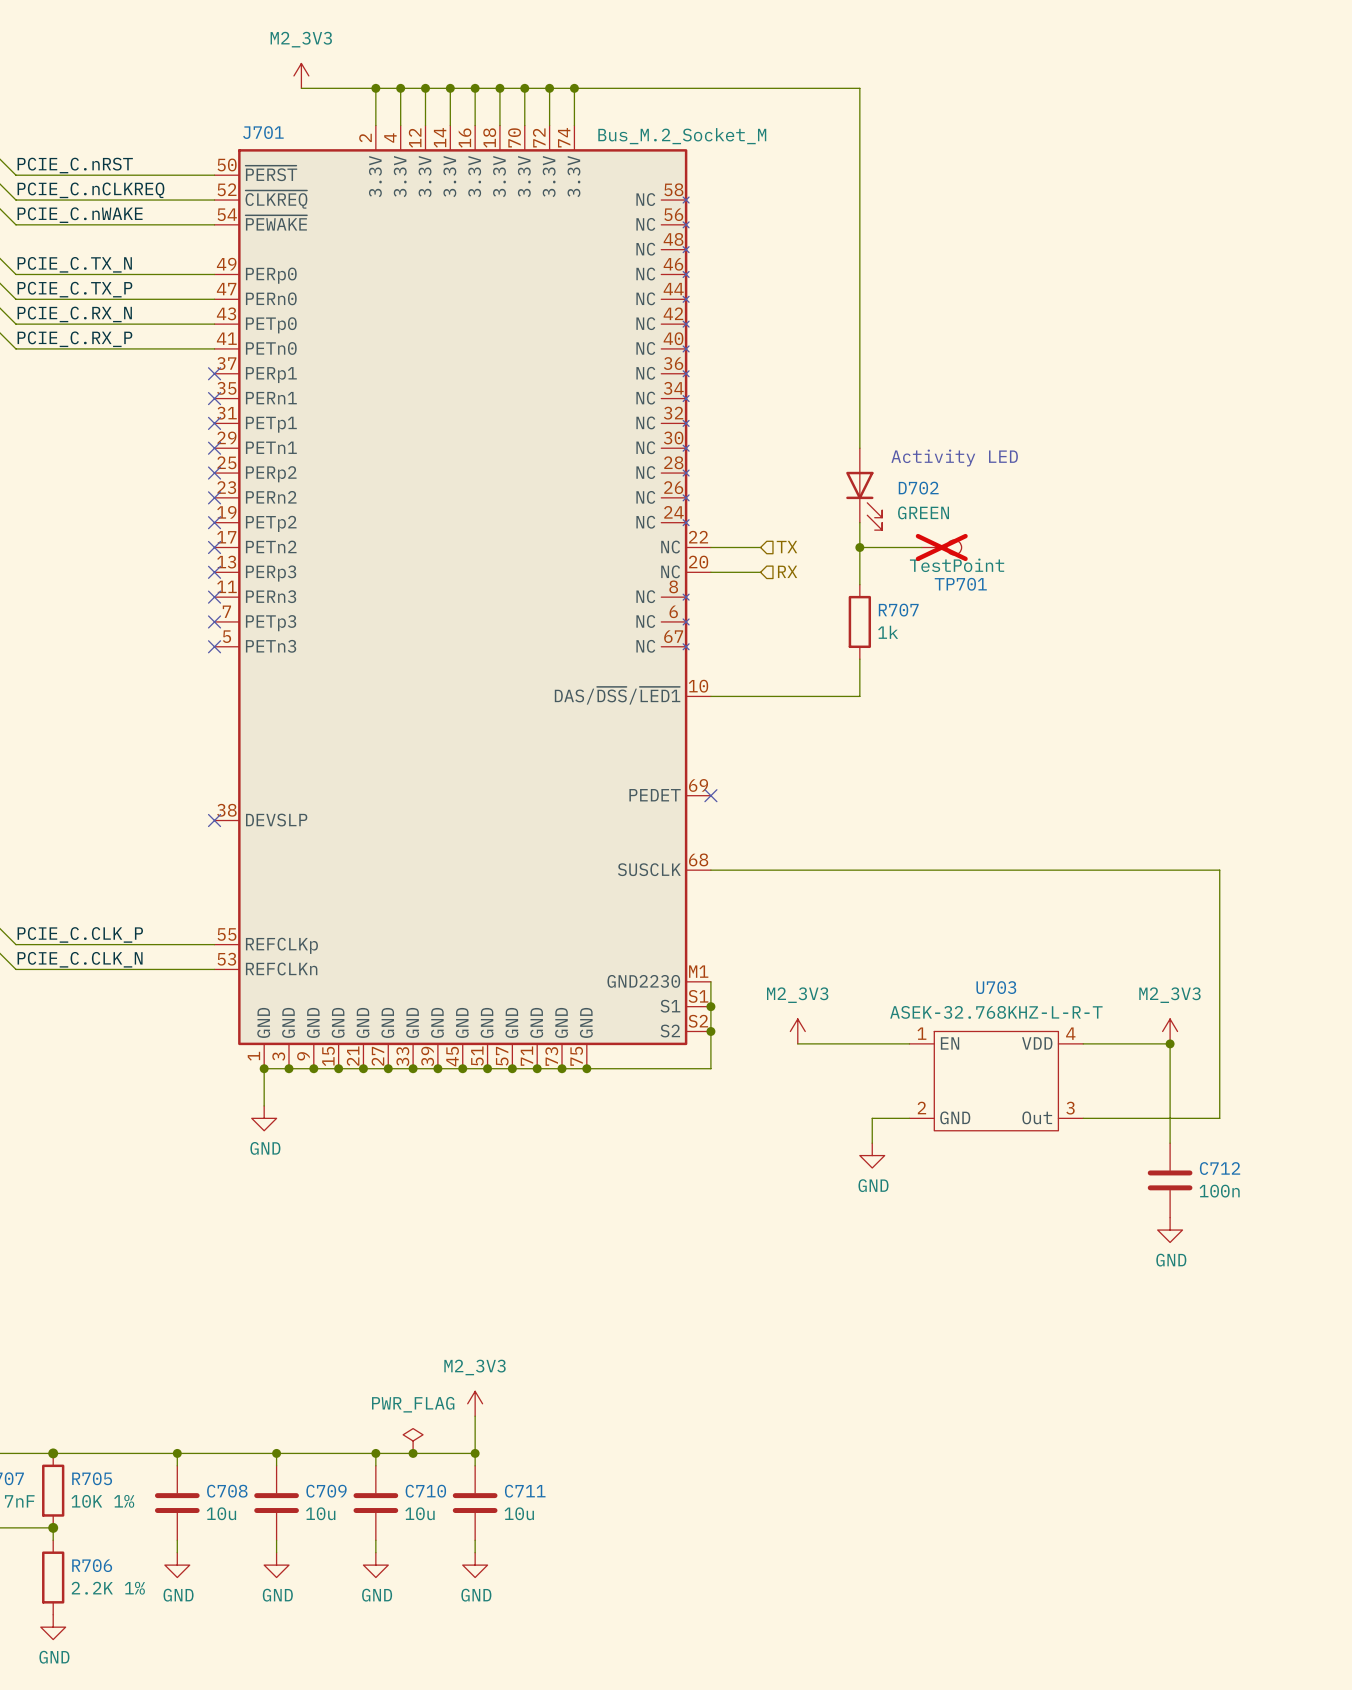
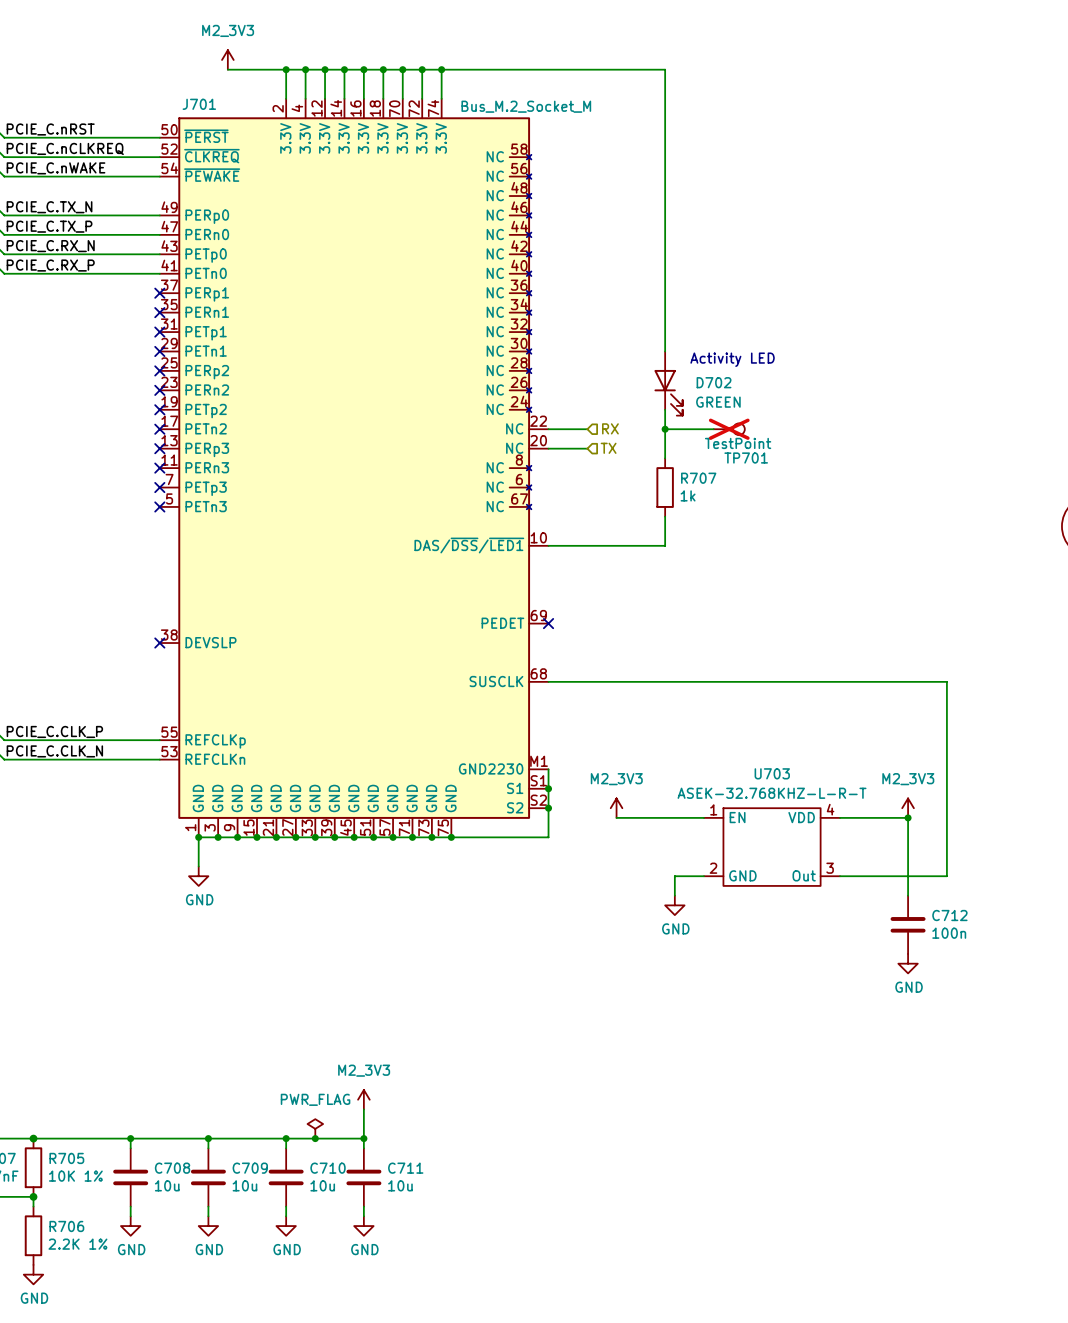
hierarchical label: TX (786, 547) -> RX (610, 428)
hierarchical label: RX (787, 571) -> TX (608, 448)

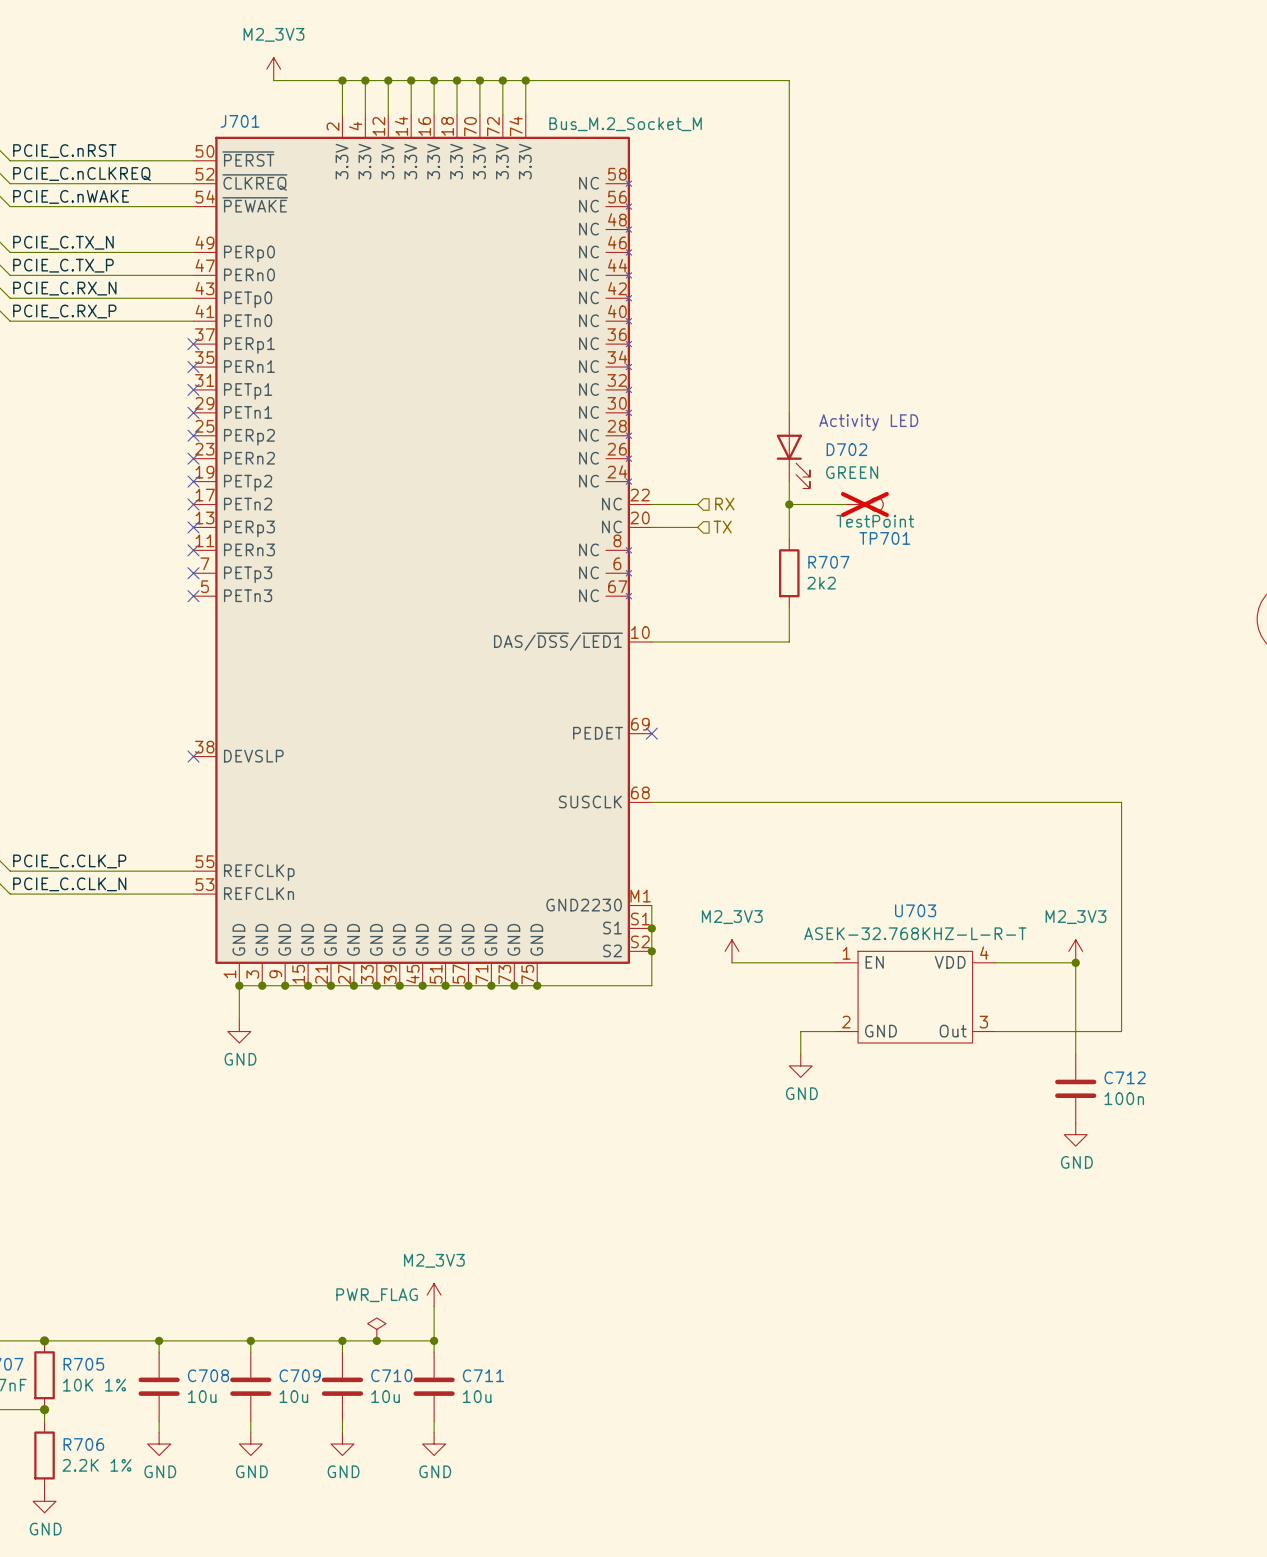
R707 value: 1k (688, 495) -> 2k2 (821, 583)

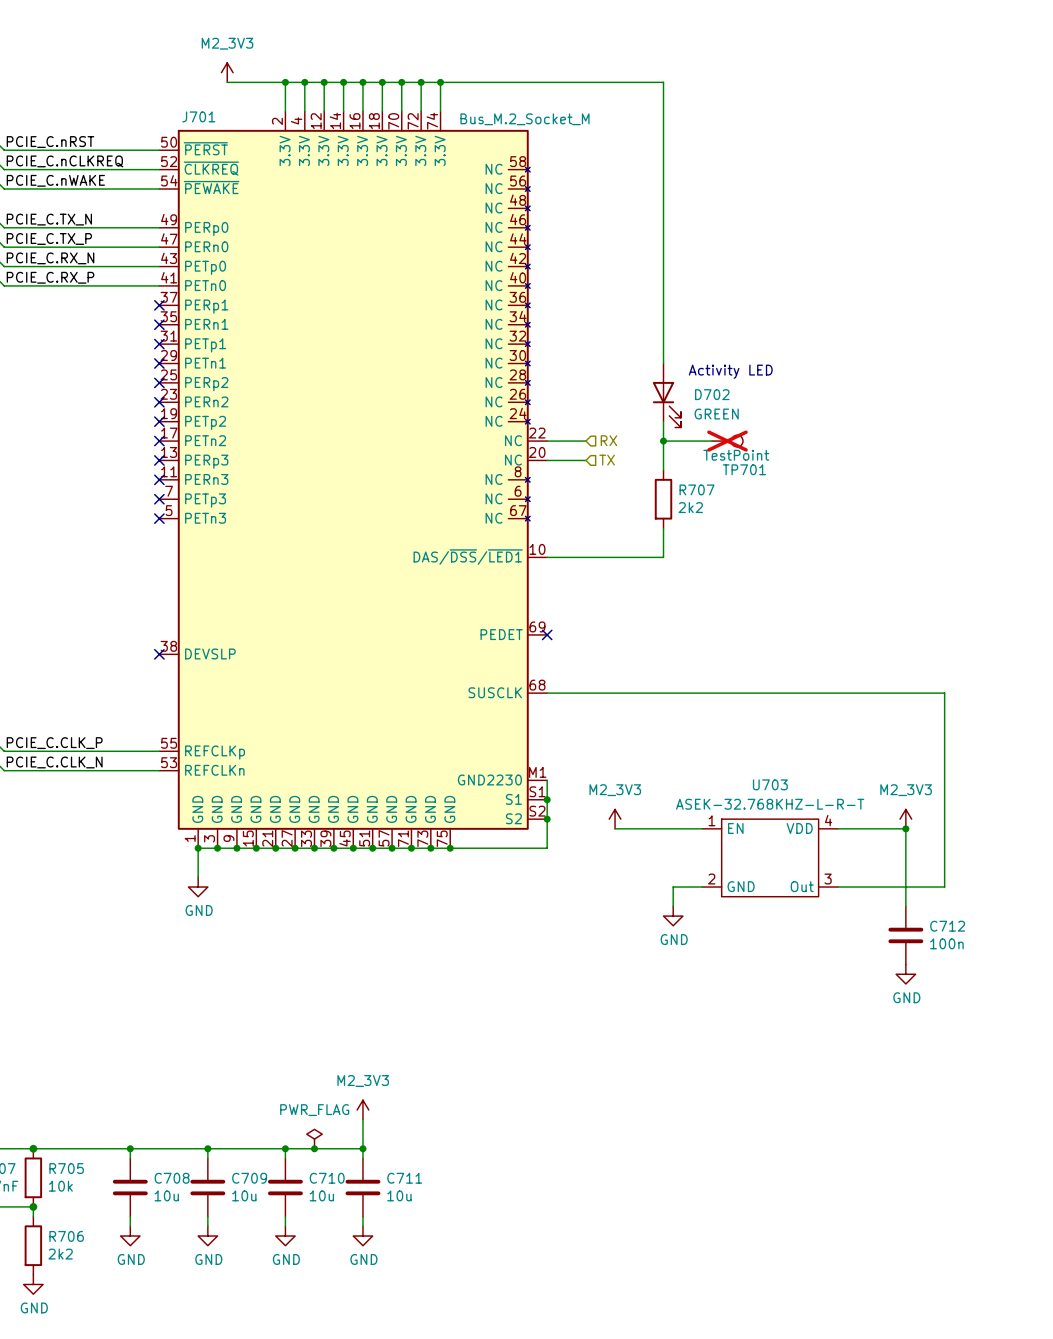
R705 value: 10K 1% (94, 1385) -> 10k (60, 1186)
R706 value: 2.2K 1% (96, 1465) -> 2k2 (60, 1254)

